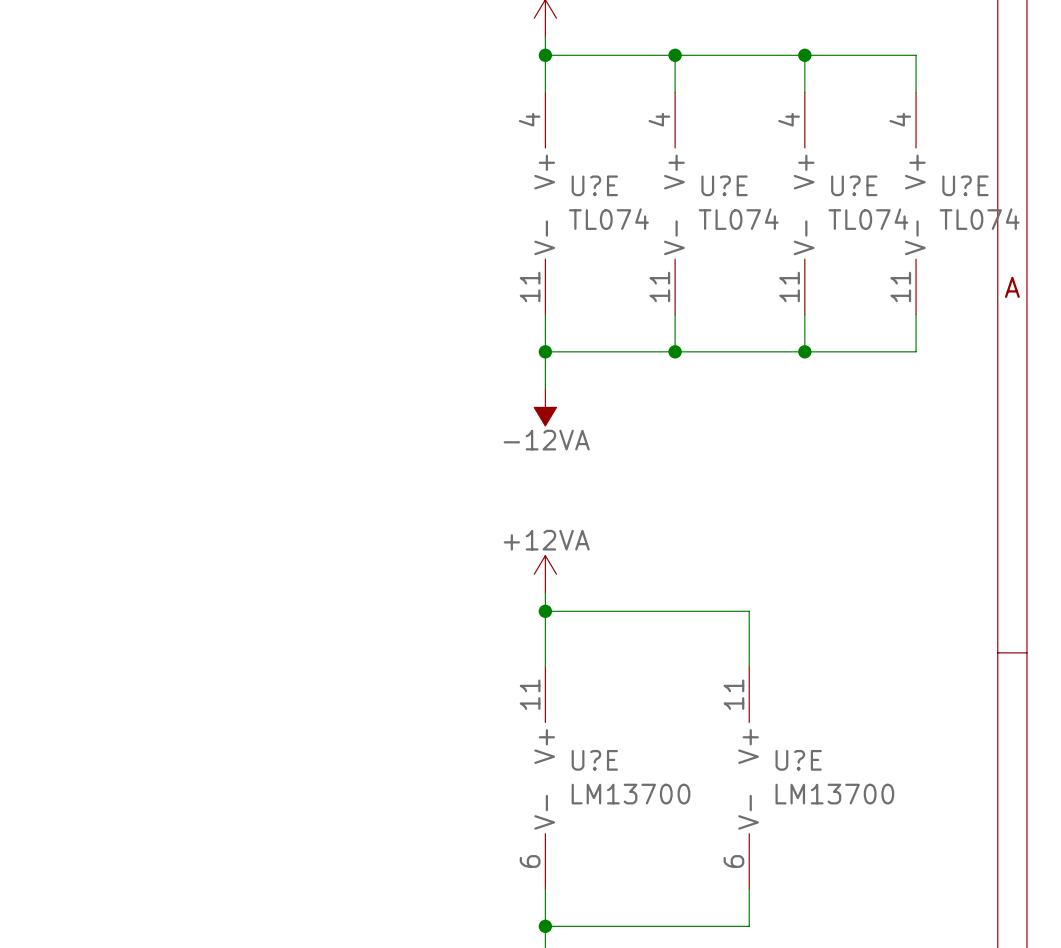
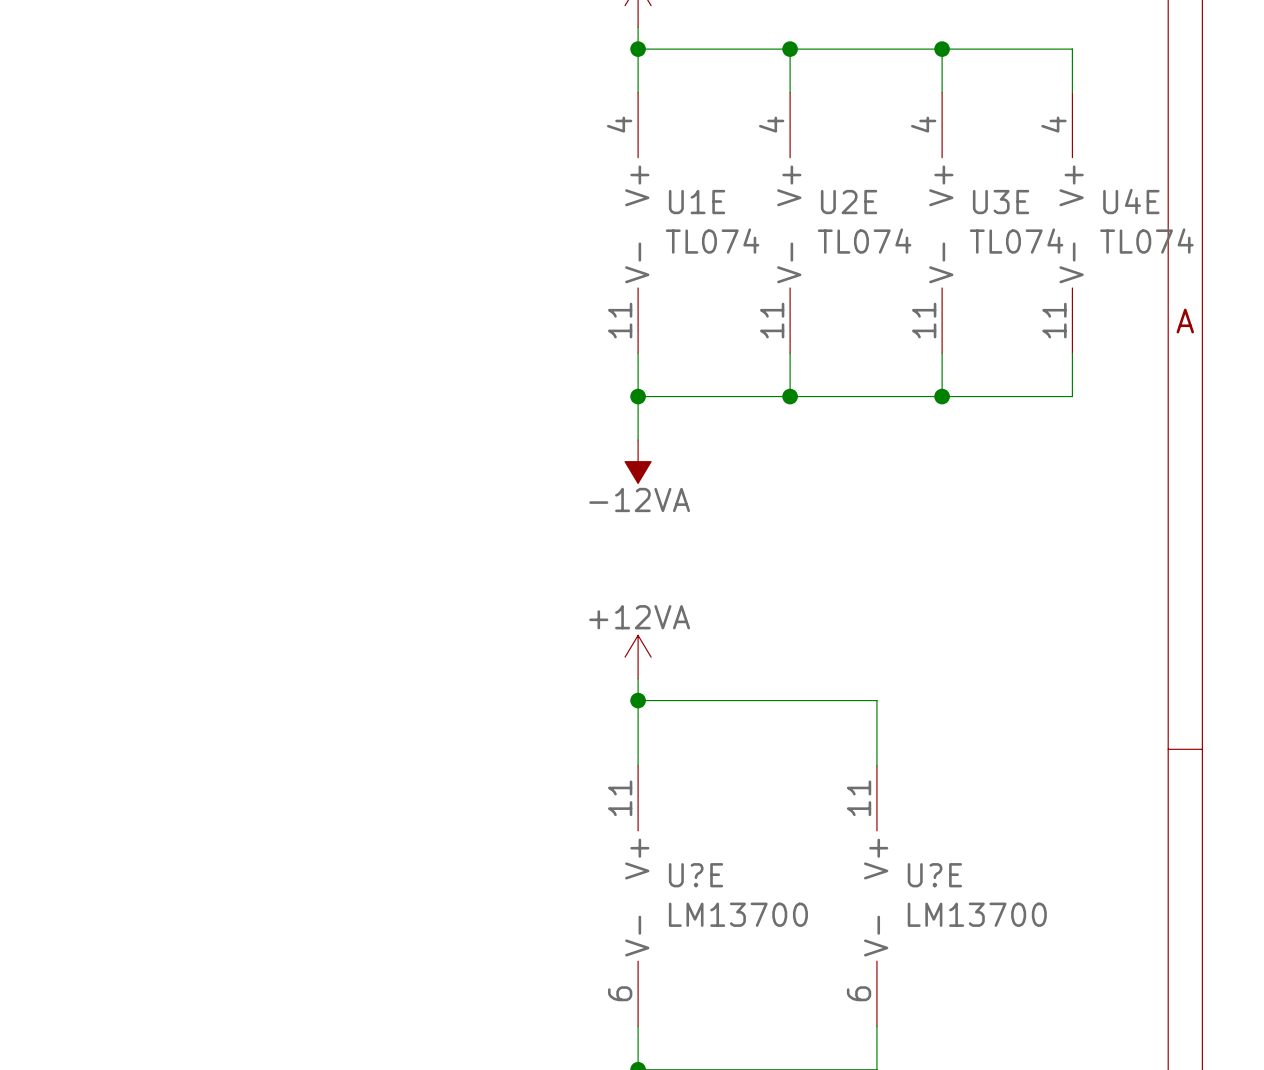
U?E name: U?E (594, 185) -> U1E (697, 202)
U?E name: U?E (724, 185) -> U2E (849, 202)
U?E name: U?E (854, 185) -> U3E (1001, 202)
U?E name: U?E (965, 185) -> U4E (1131, 201)

